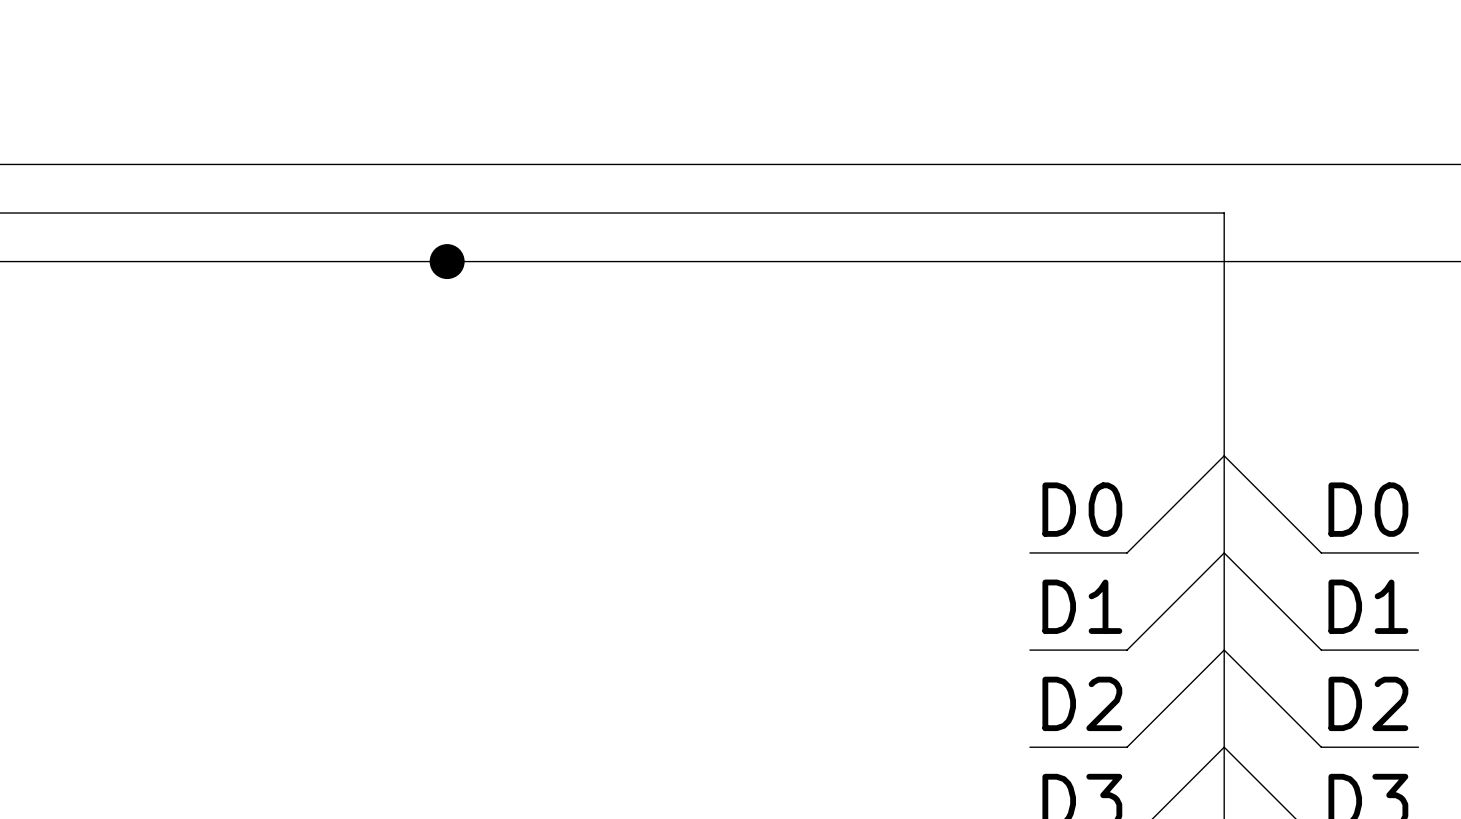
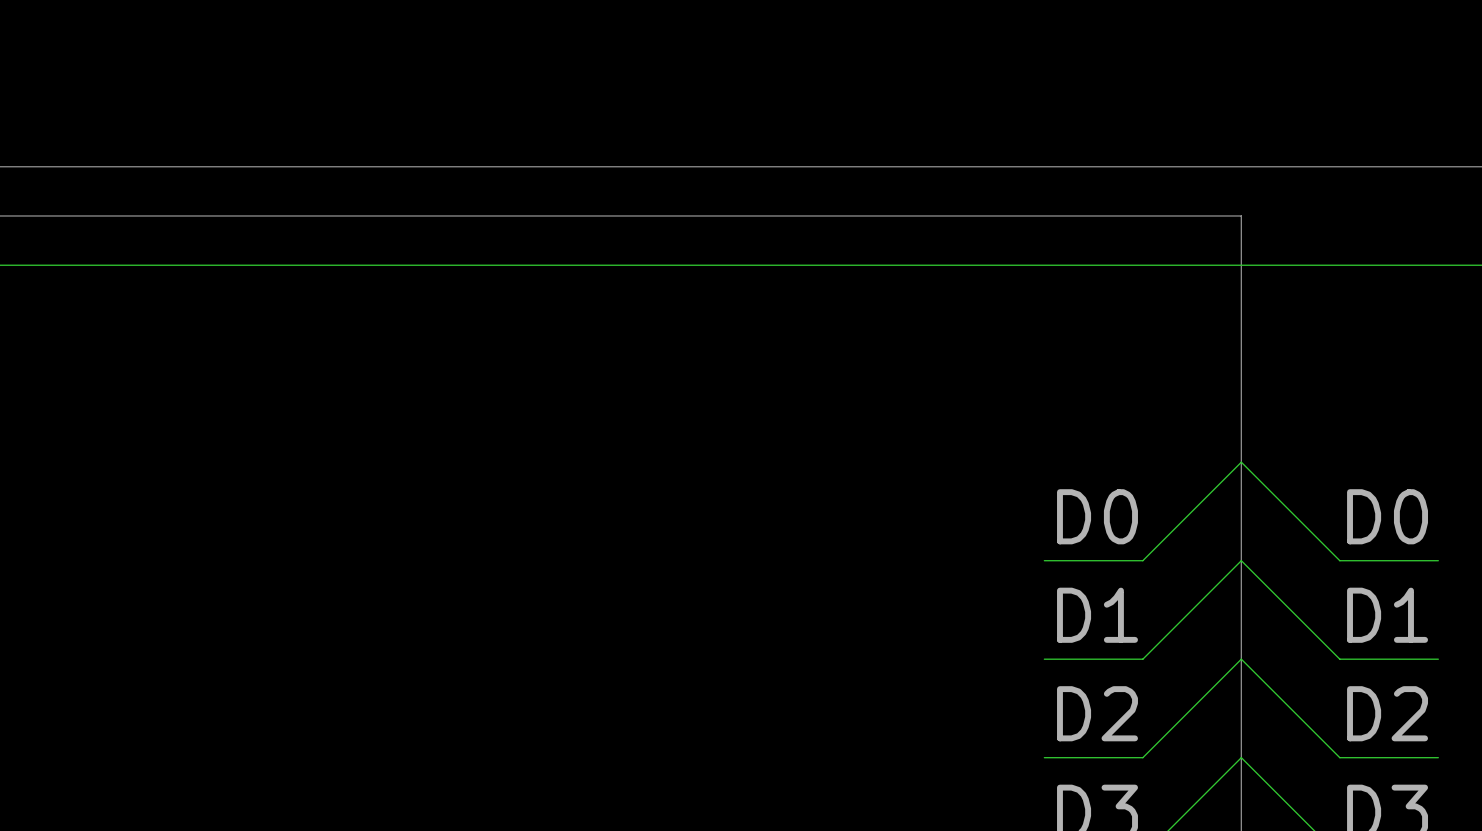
junction: (447, 261) -> none

